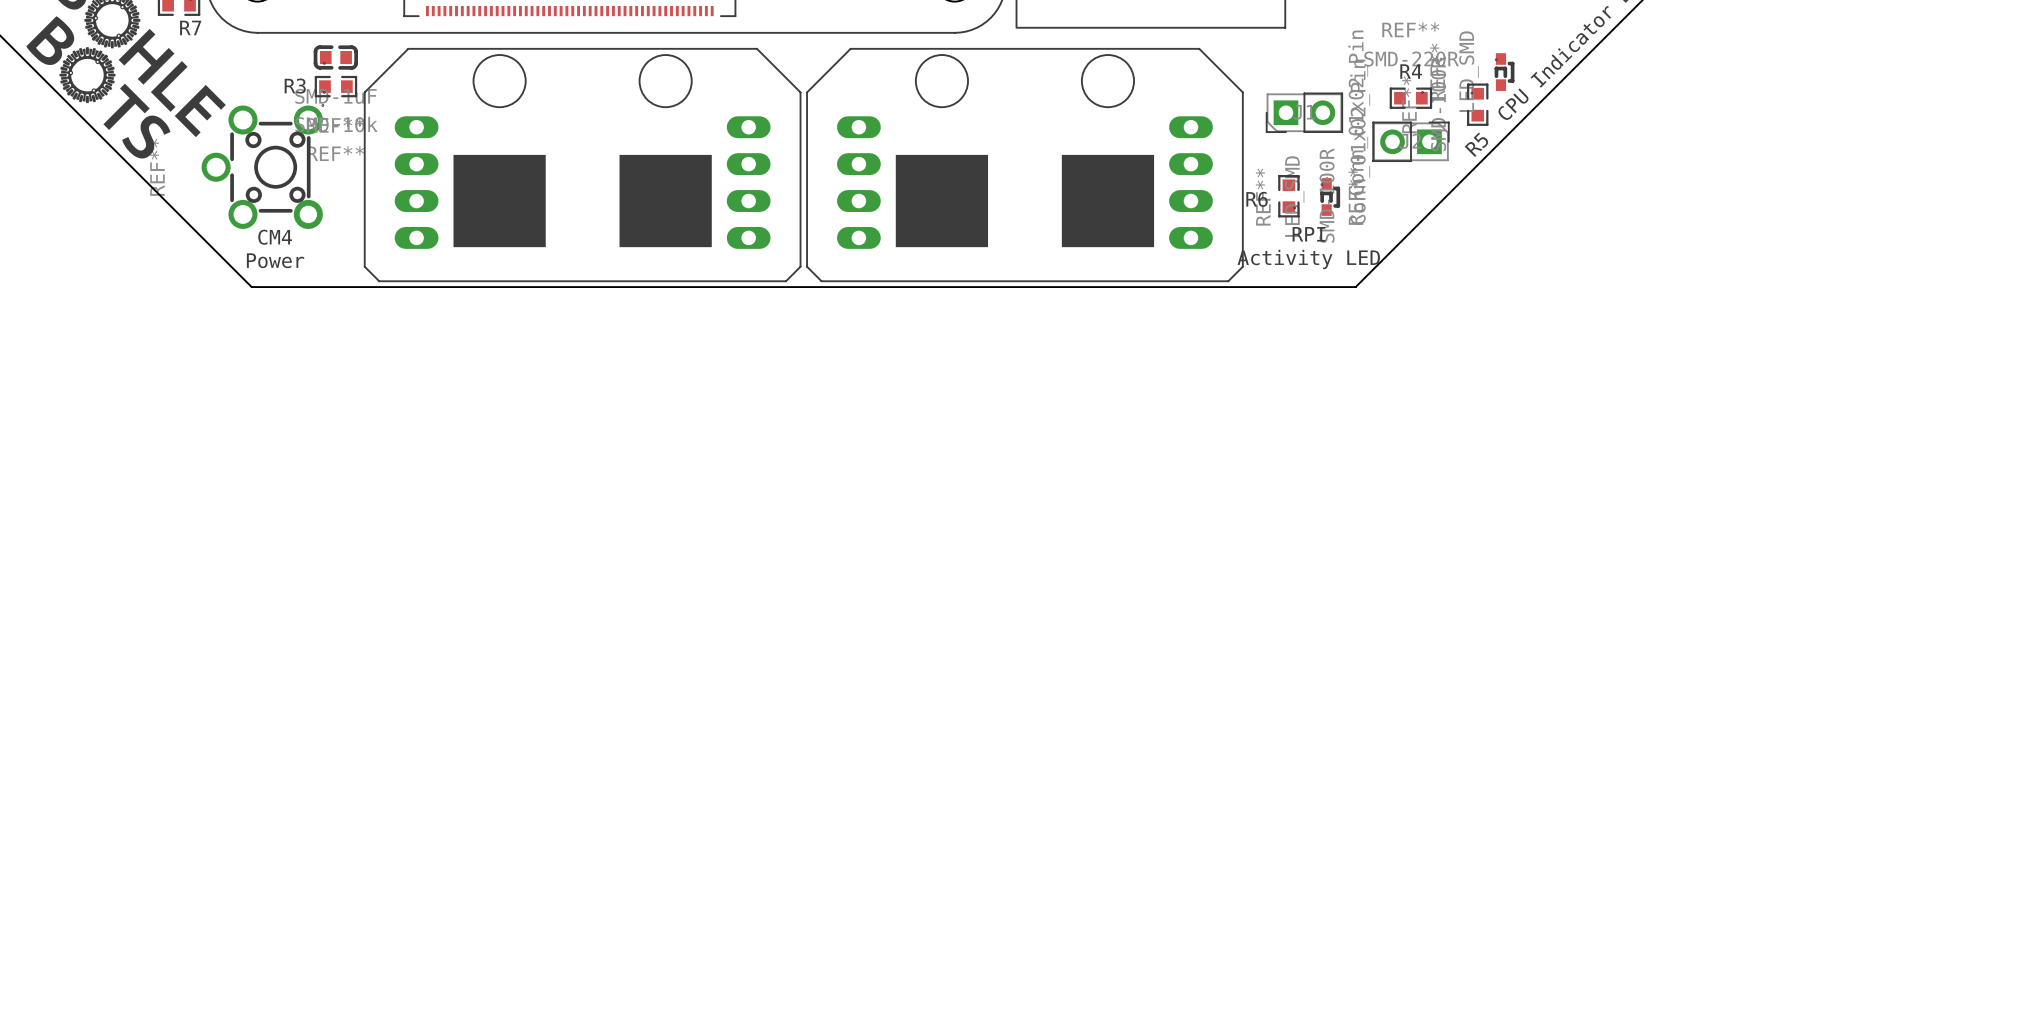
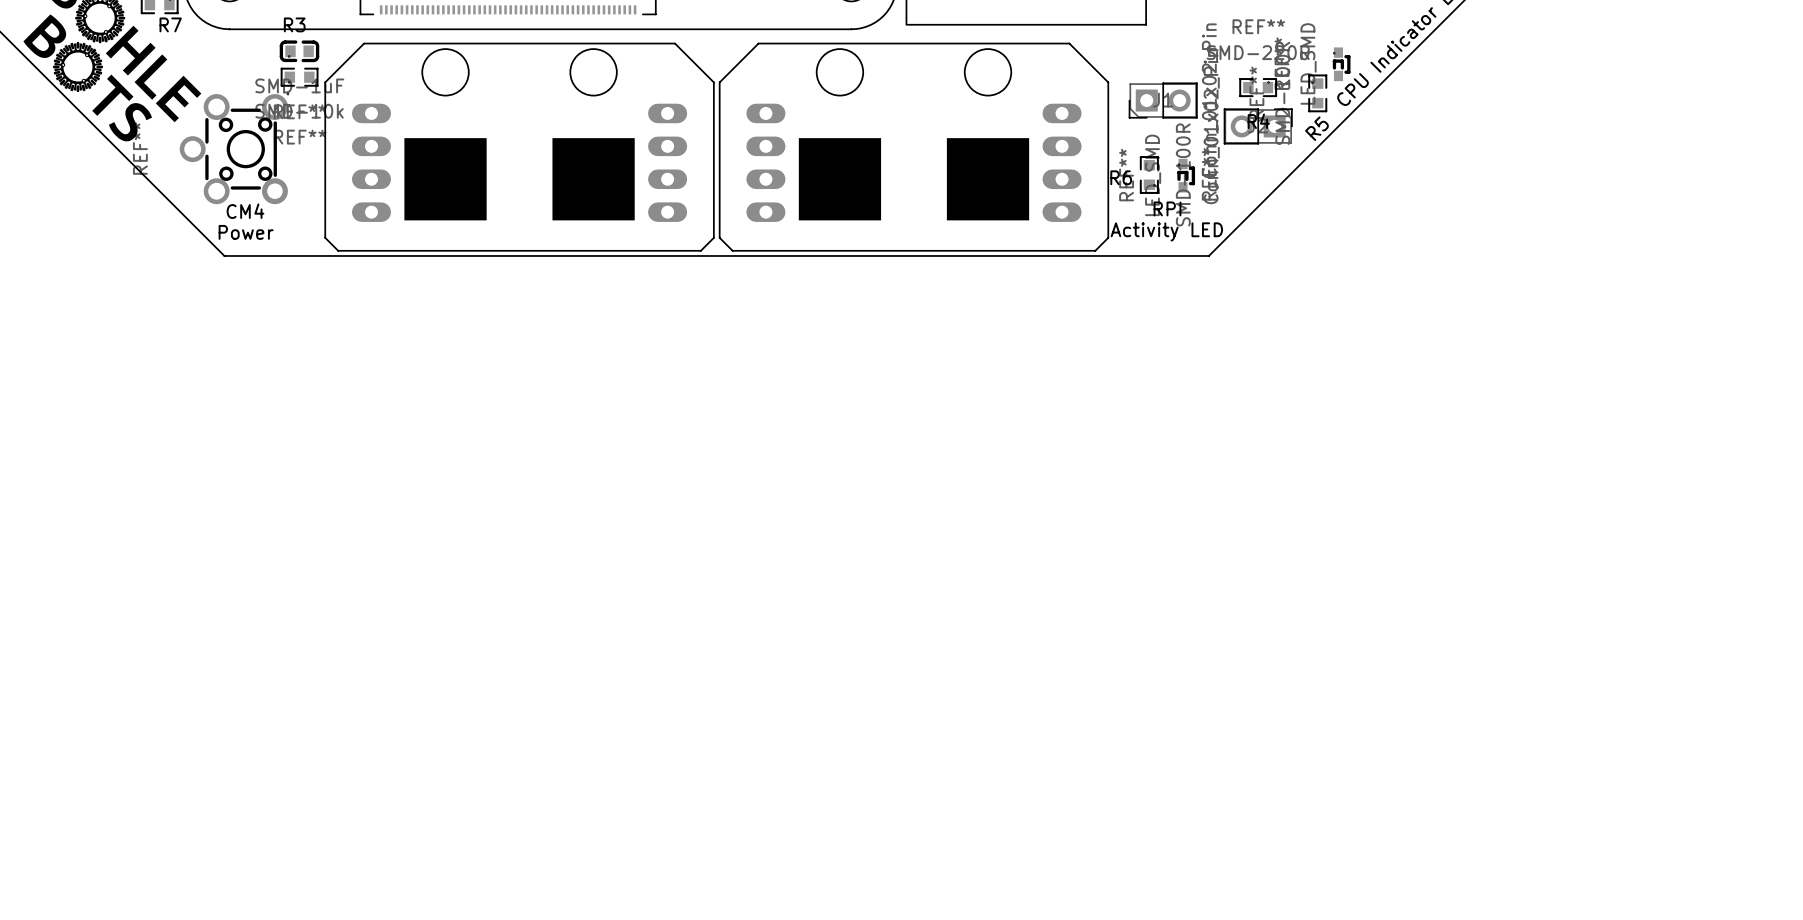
R4 name position: R4 (1411, 71) -> R4 (1258, 121)
R3 name position: R3 (295, 86) -> R3 (294, 24)

